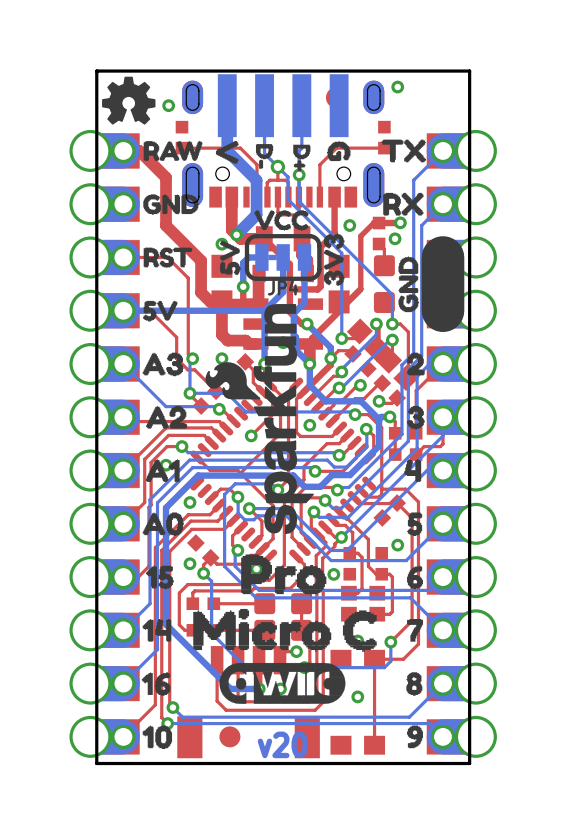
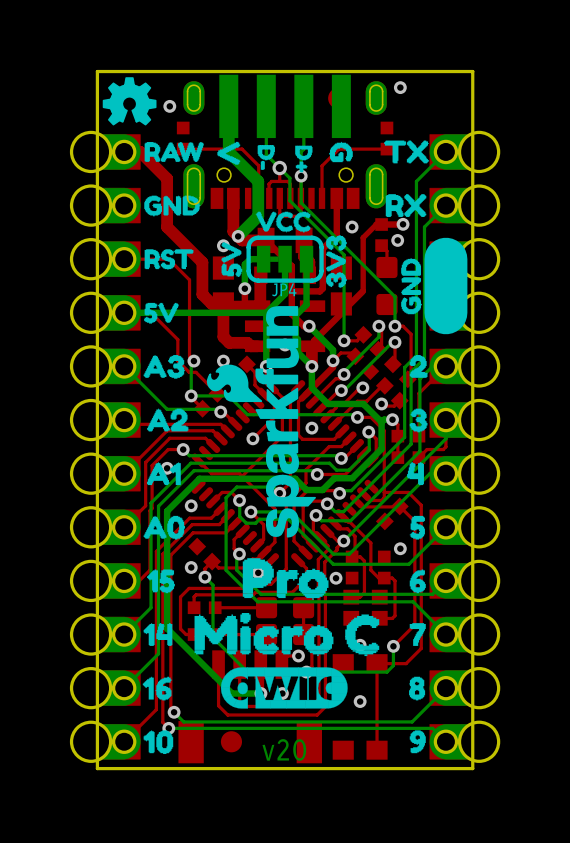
part footprint: [346, 318, 390, 362] -> [354, 325, 388, 359]
part footprint: [376, 347, 420, 391] -> [383, 355, 417, 389]

